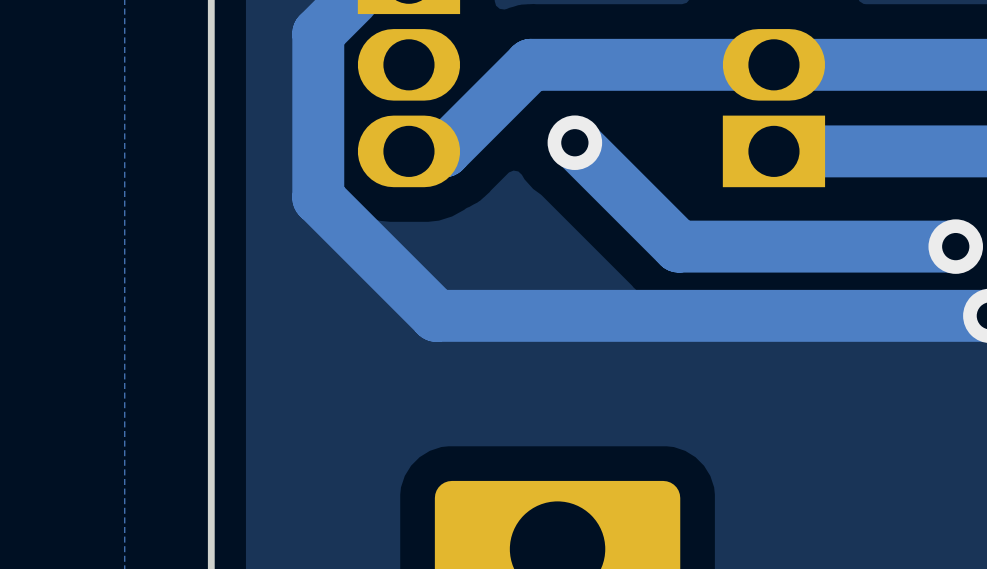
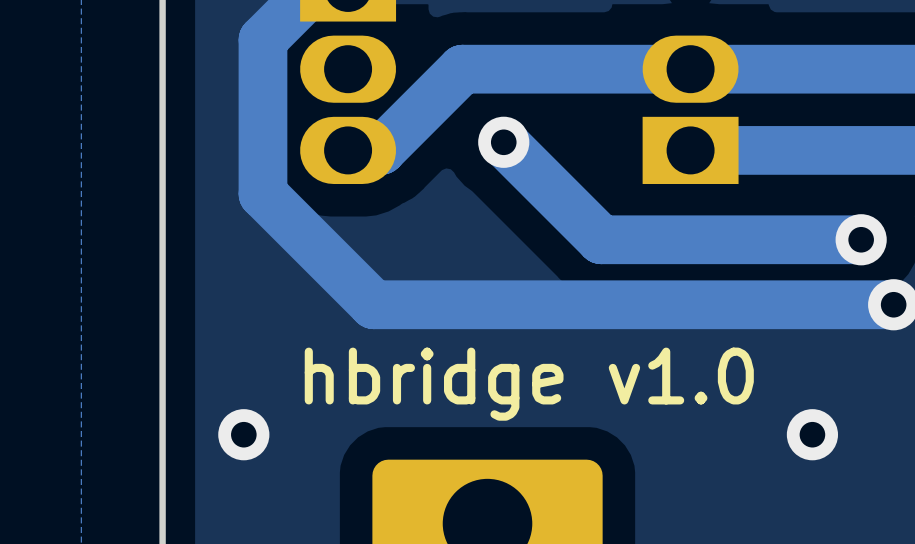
text: none -> hbridge v1.0 (529, 384)
via: none -> (243, 434)
via: none -> (812, 434)

